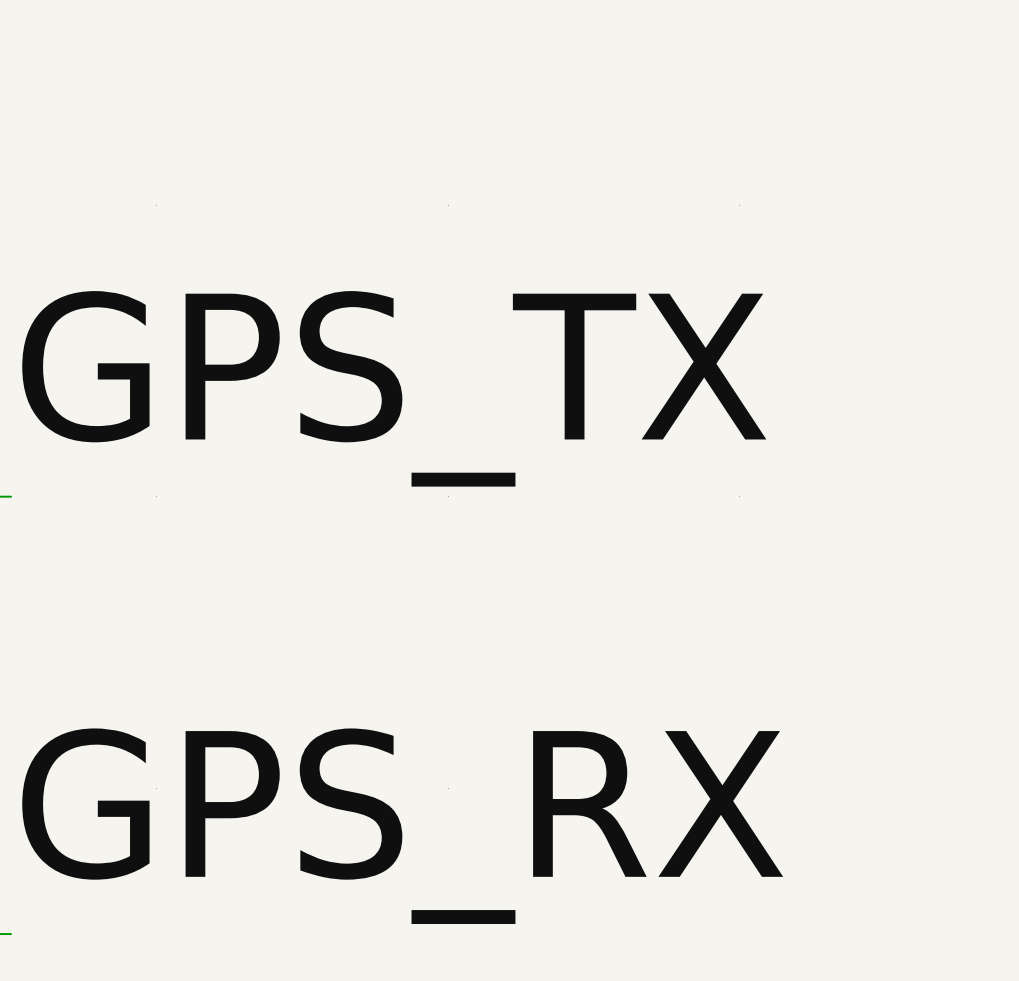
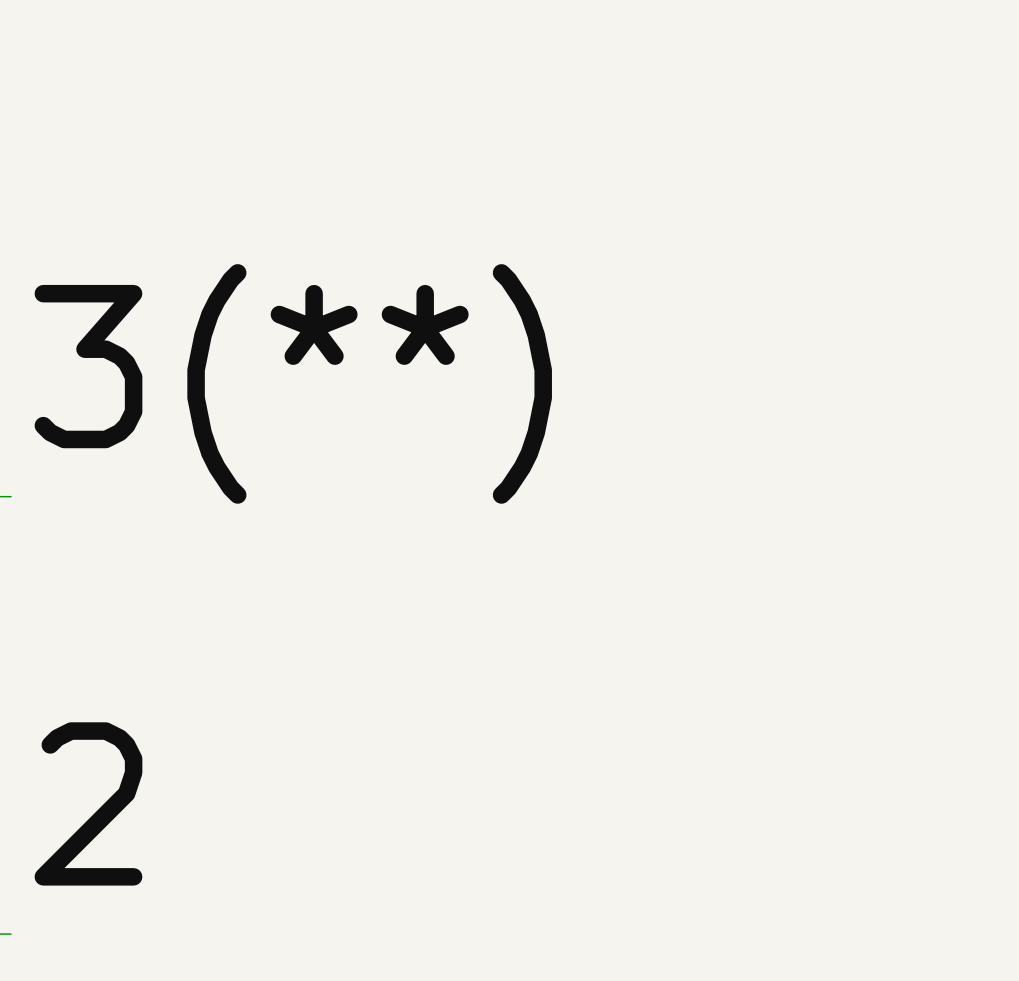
label: GPS_TX (394, 388) -> 3(**) (293, 383)
label: GPS_RX (402, 826) -> 2 (88, 803)

